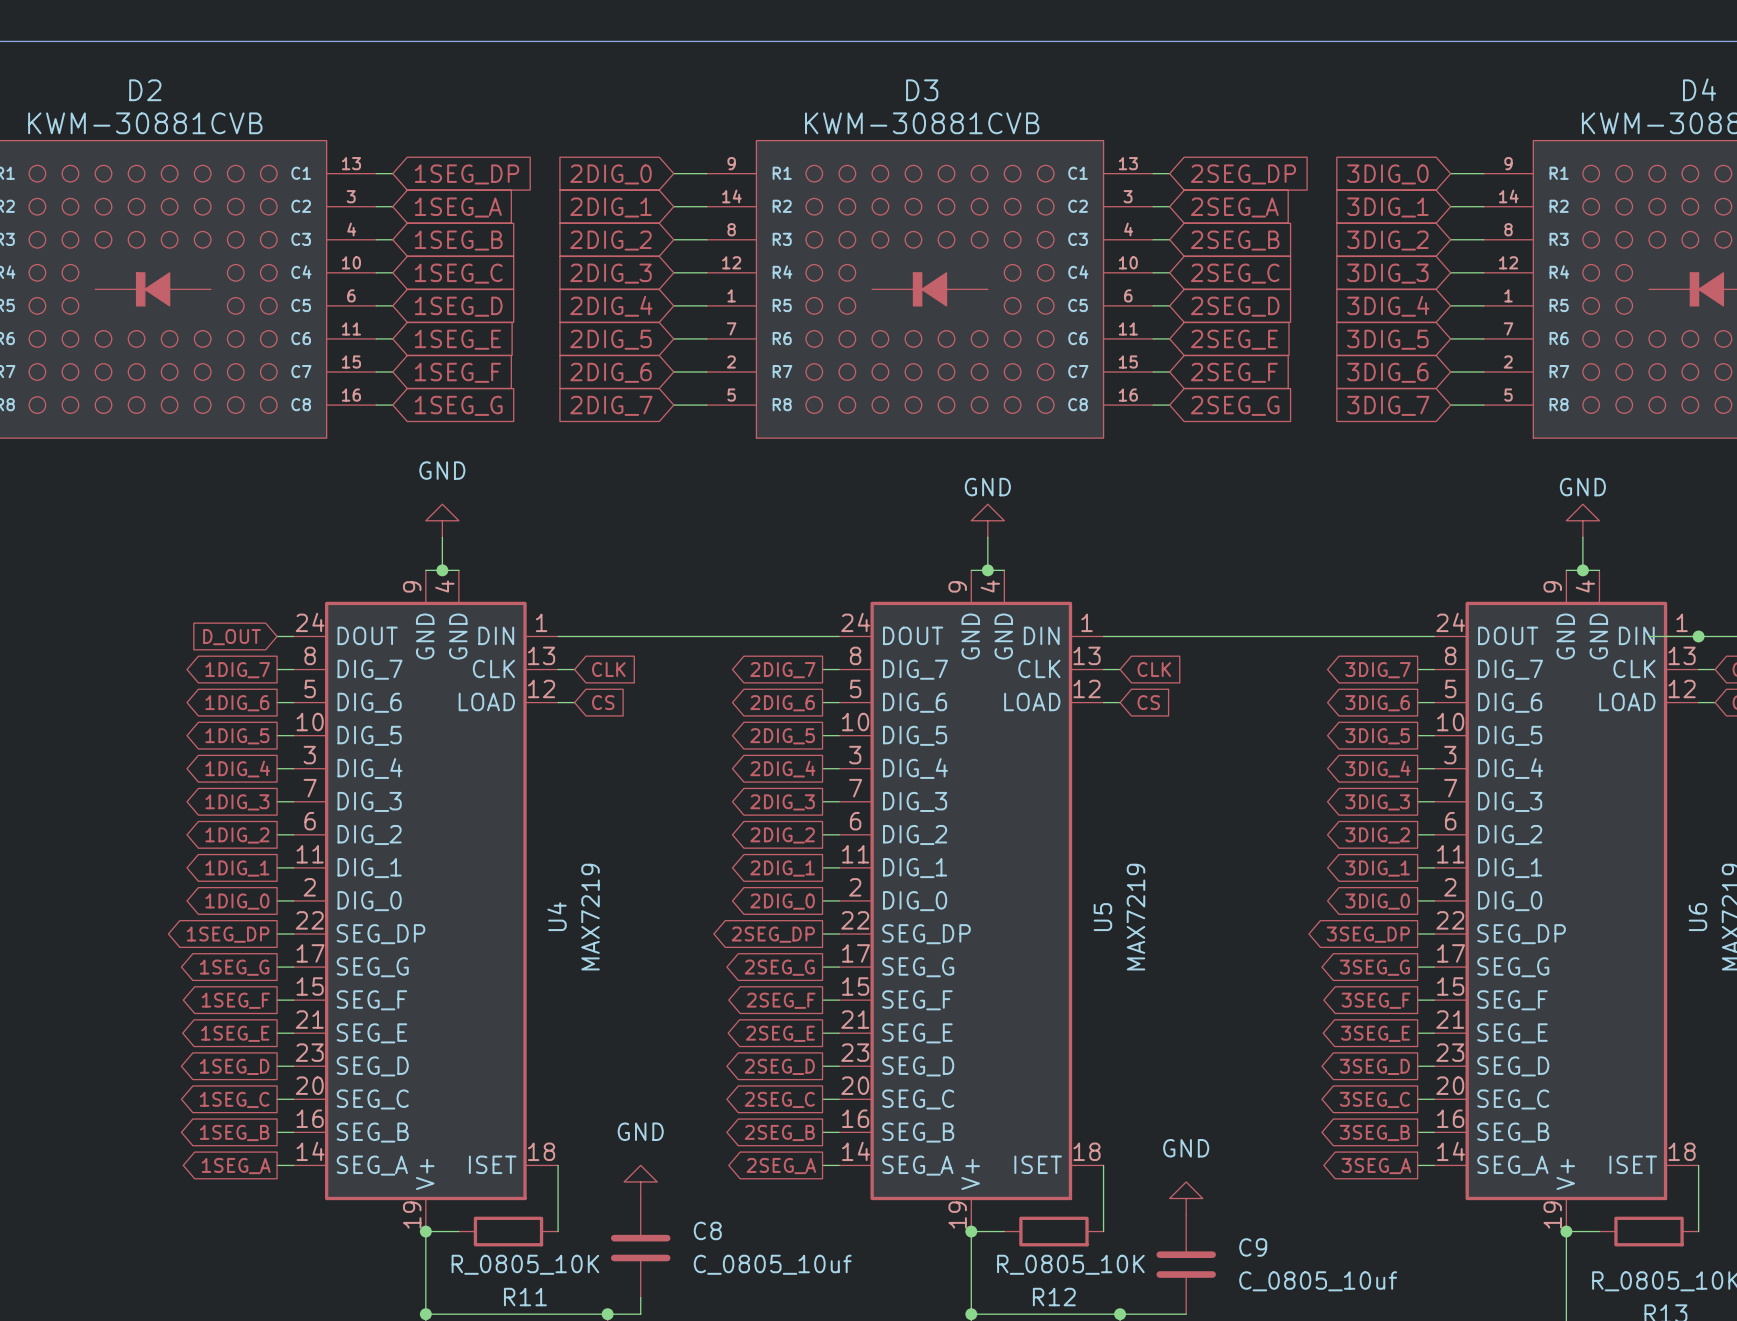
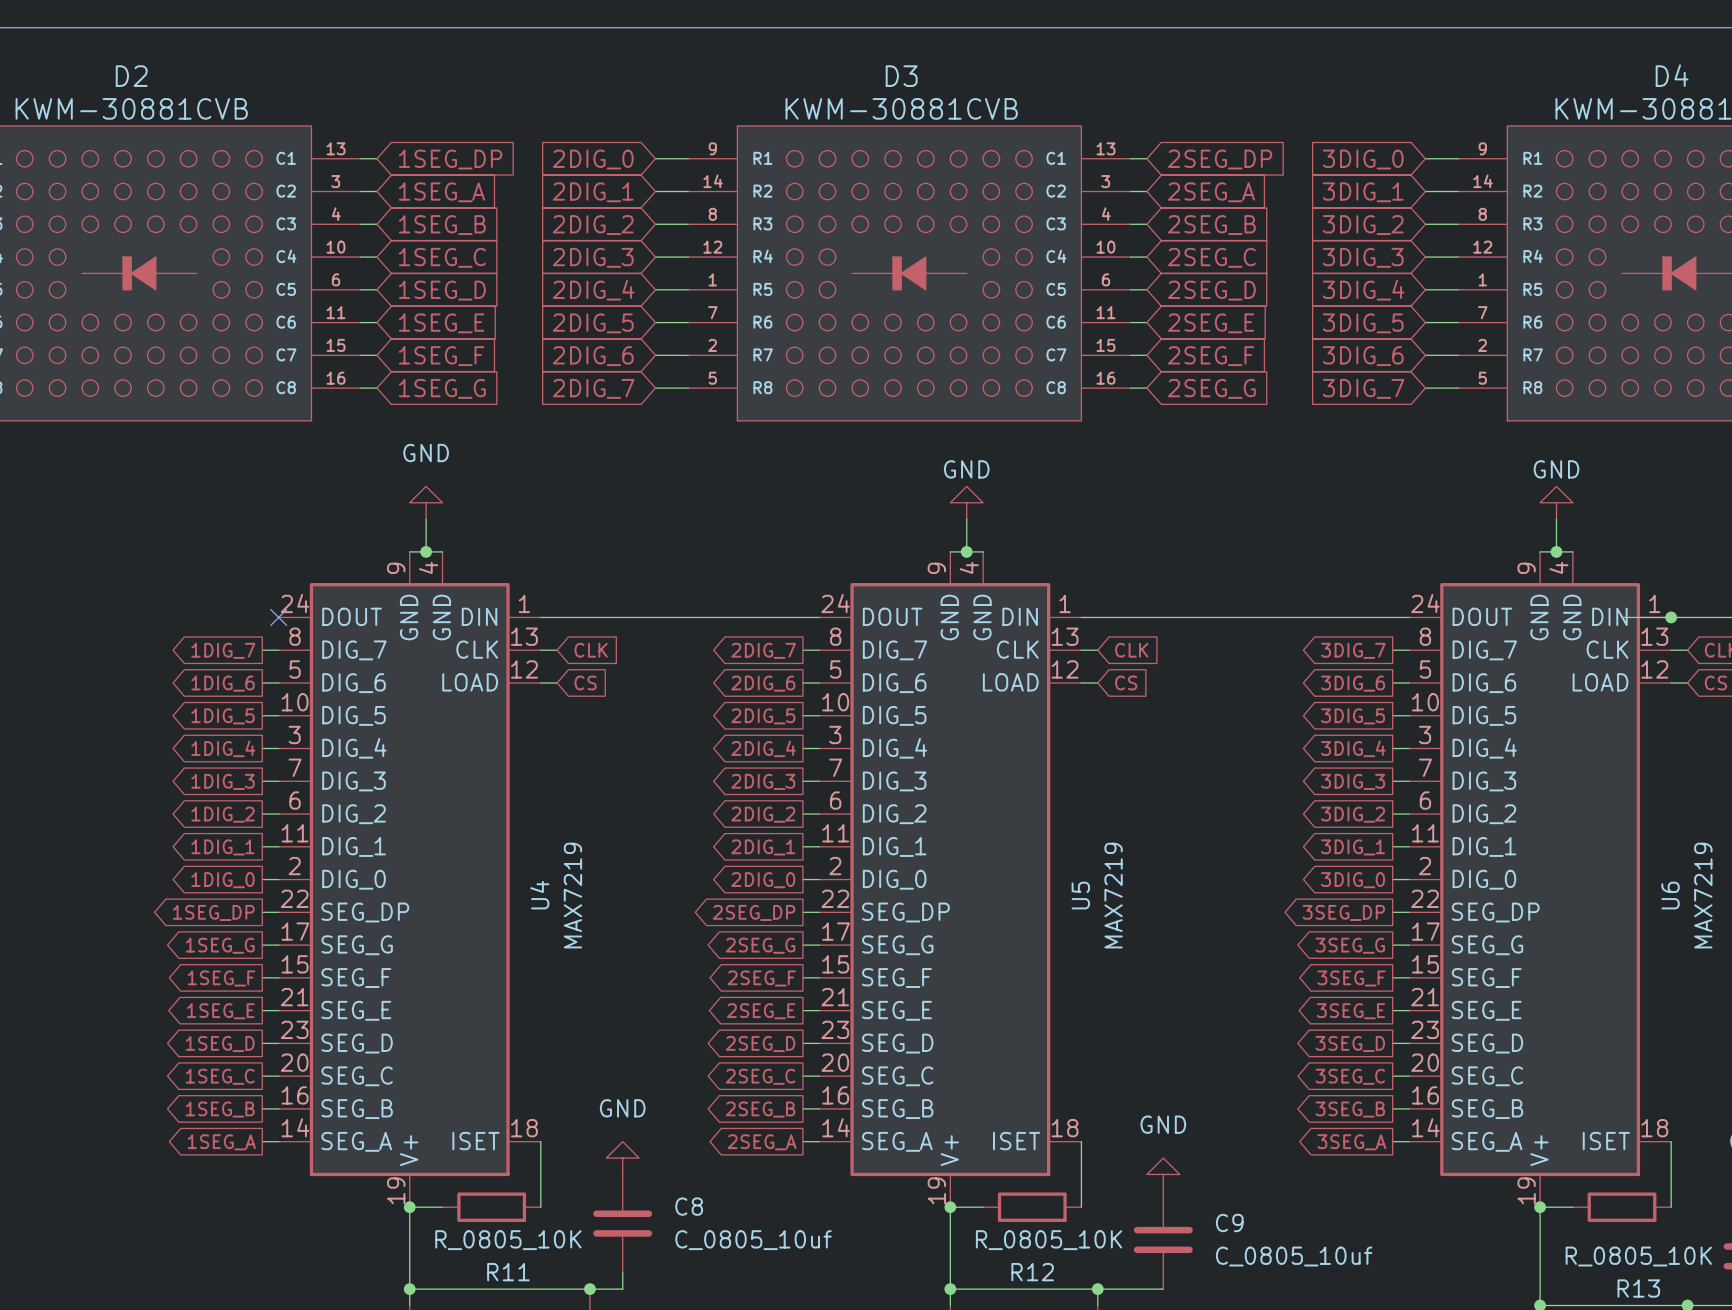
wire: (277, 636) (293, 636) -> none
no-connect mark: none -> (278, 617)
global label: D_OUT (231, 637) -> none

